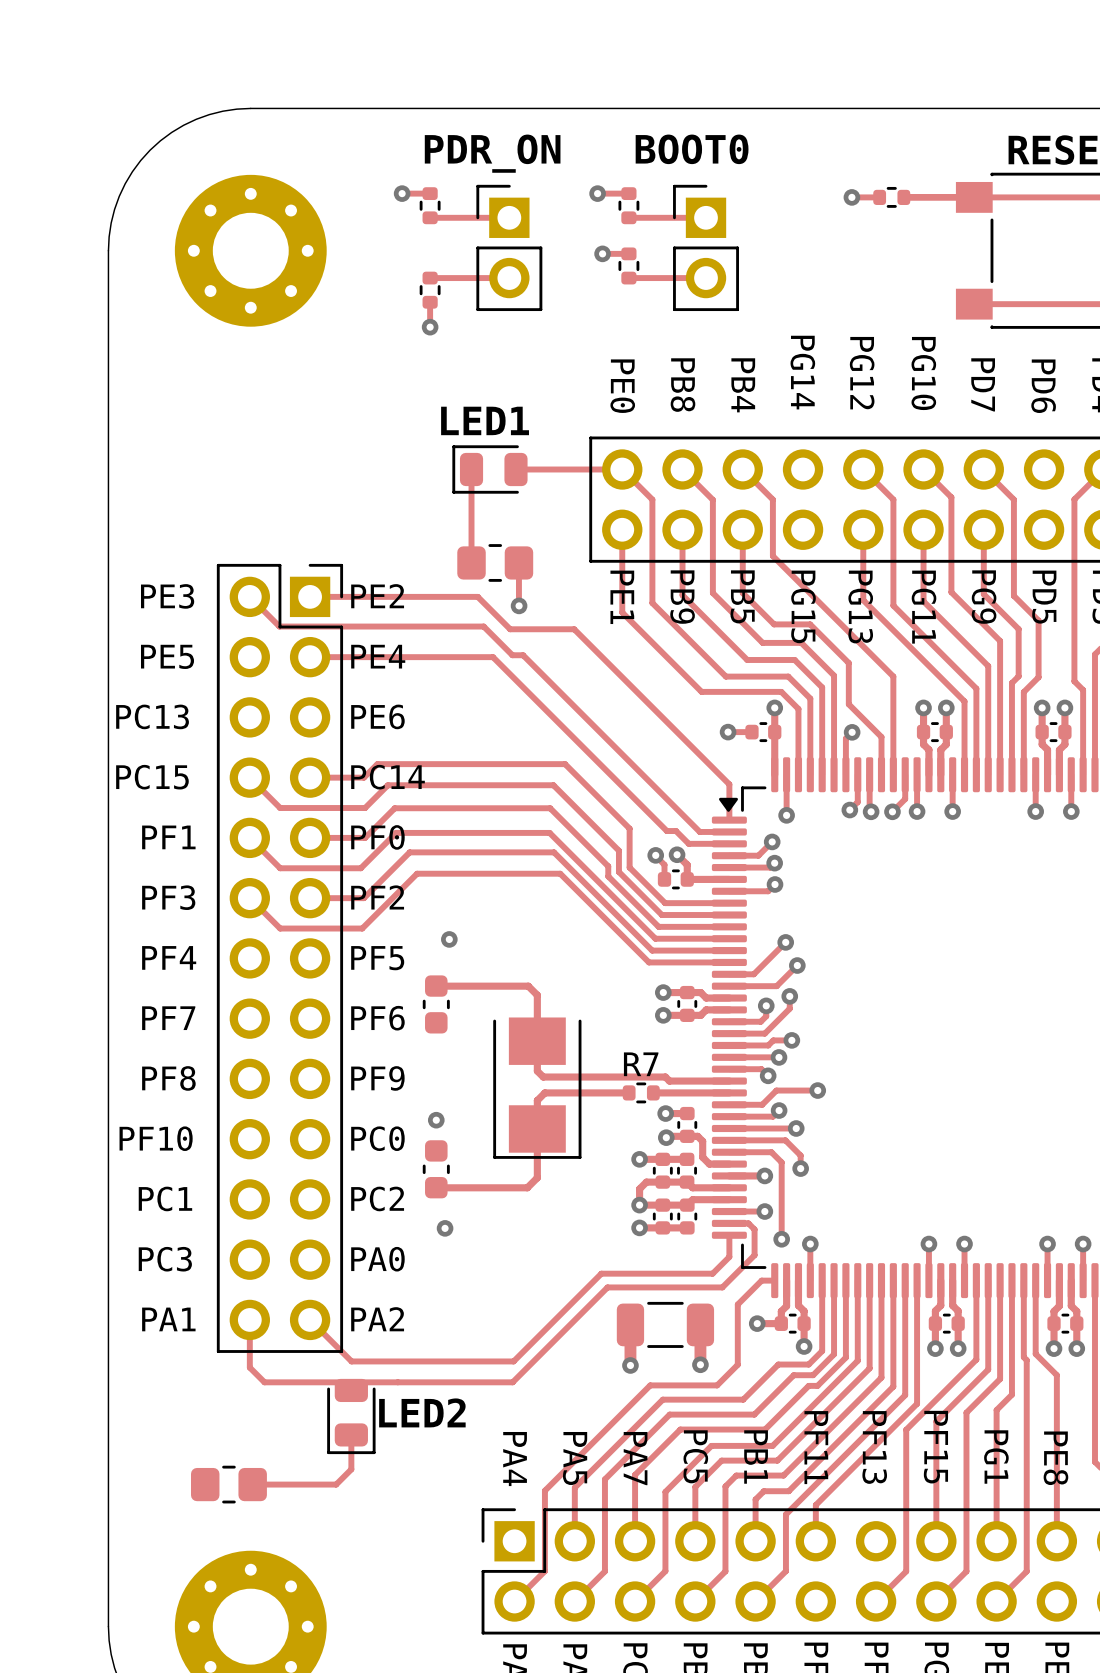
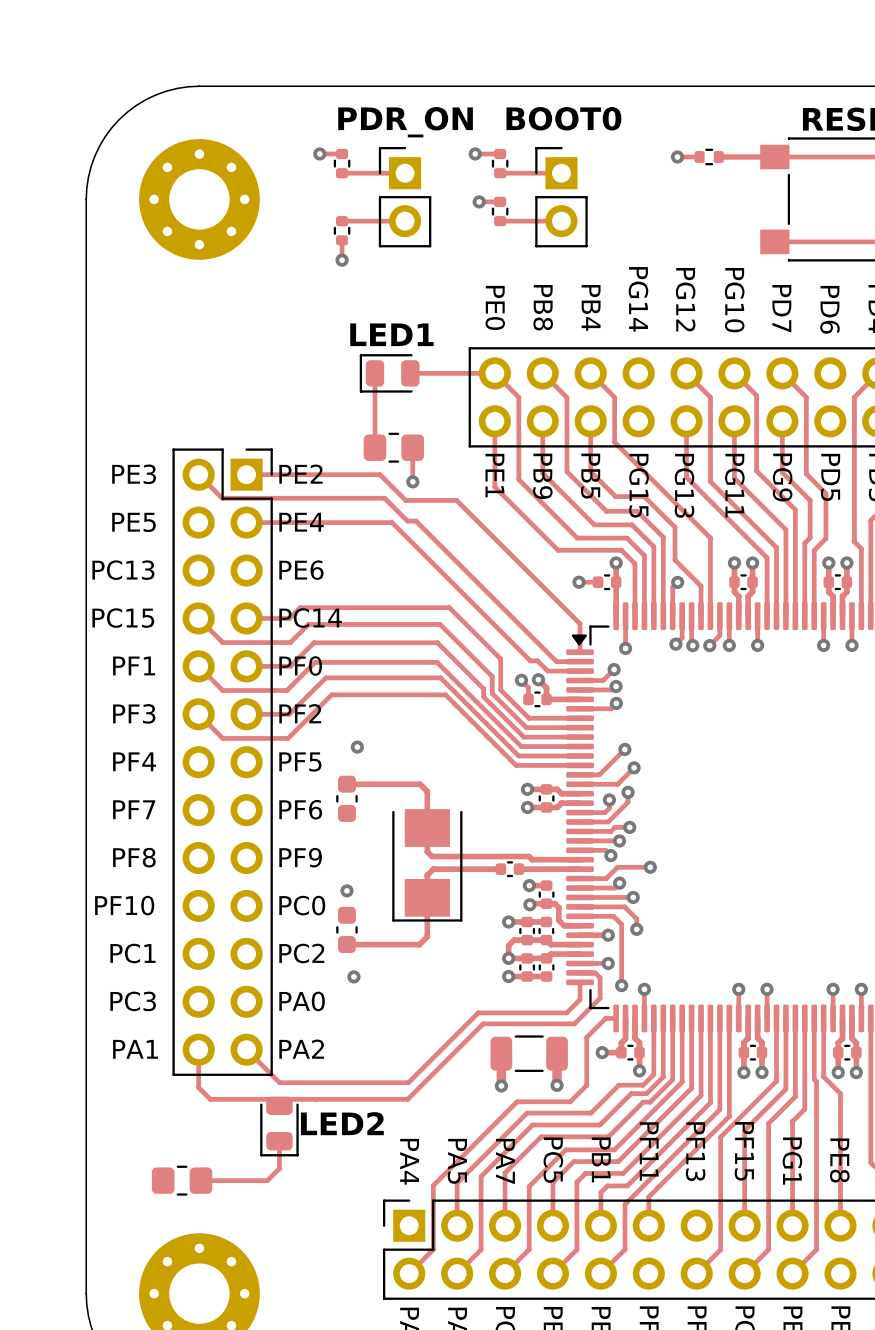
R7: (641, 1092) -> none
part: none -> (509, 869)

